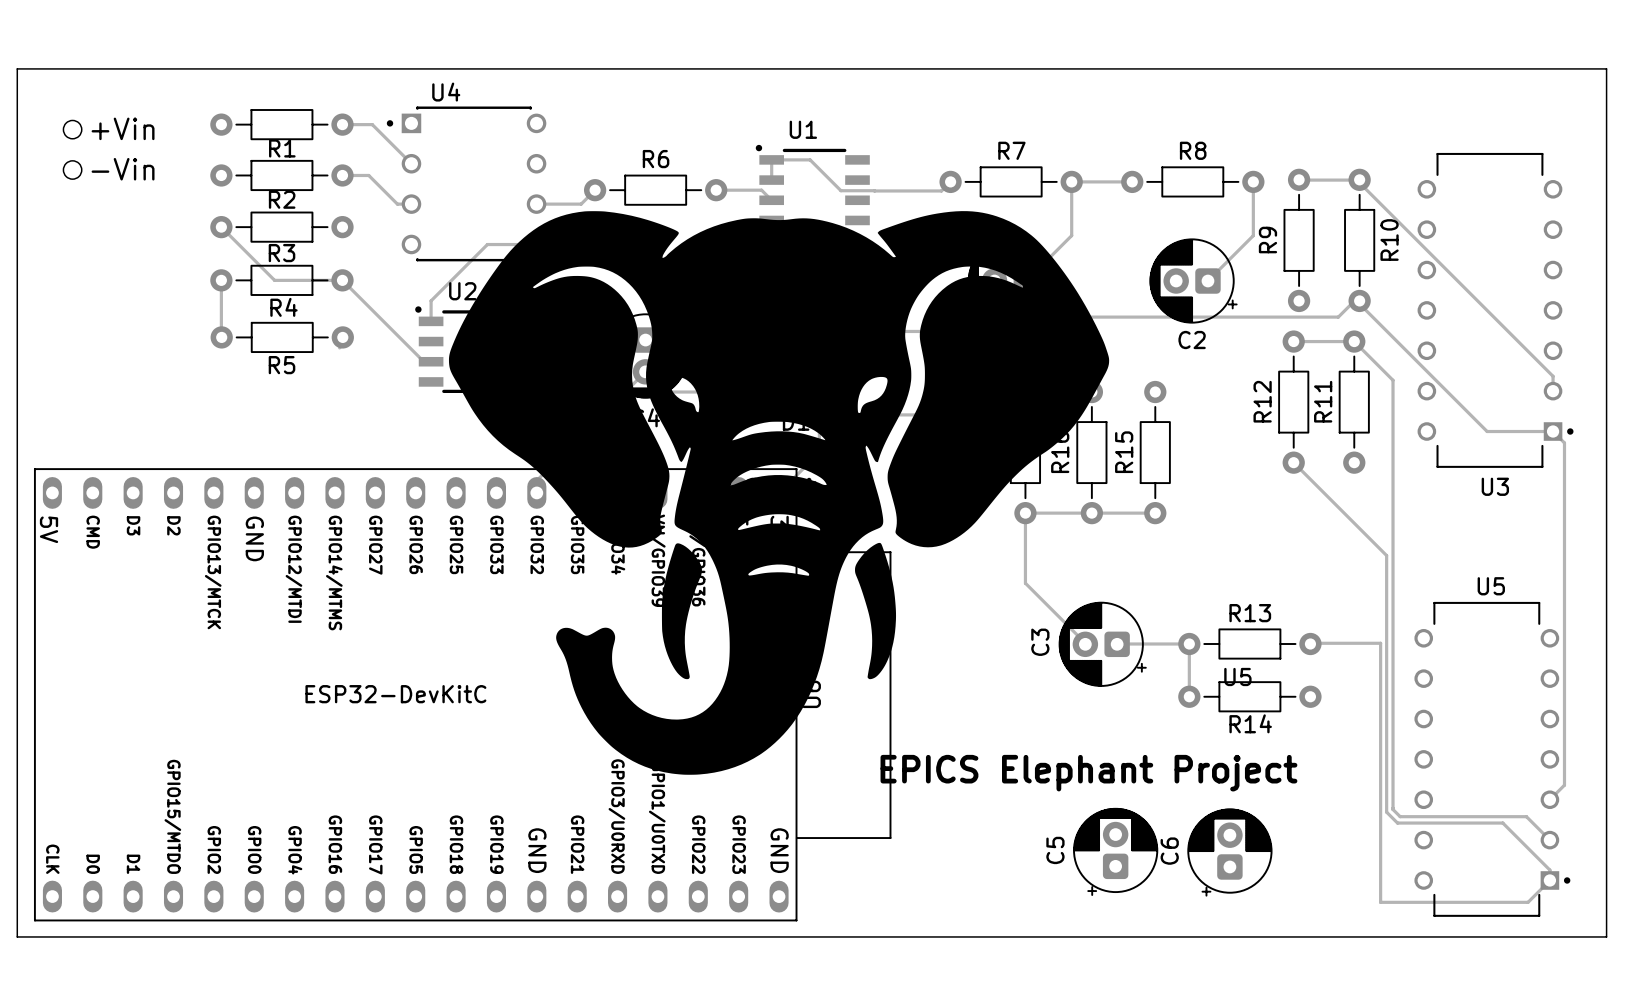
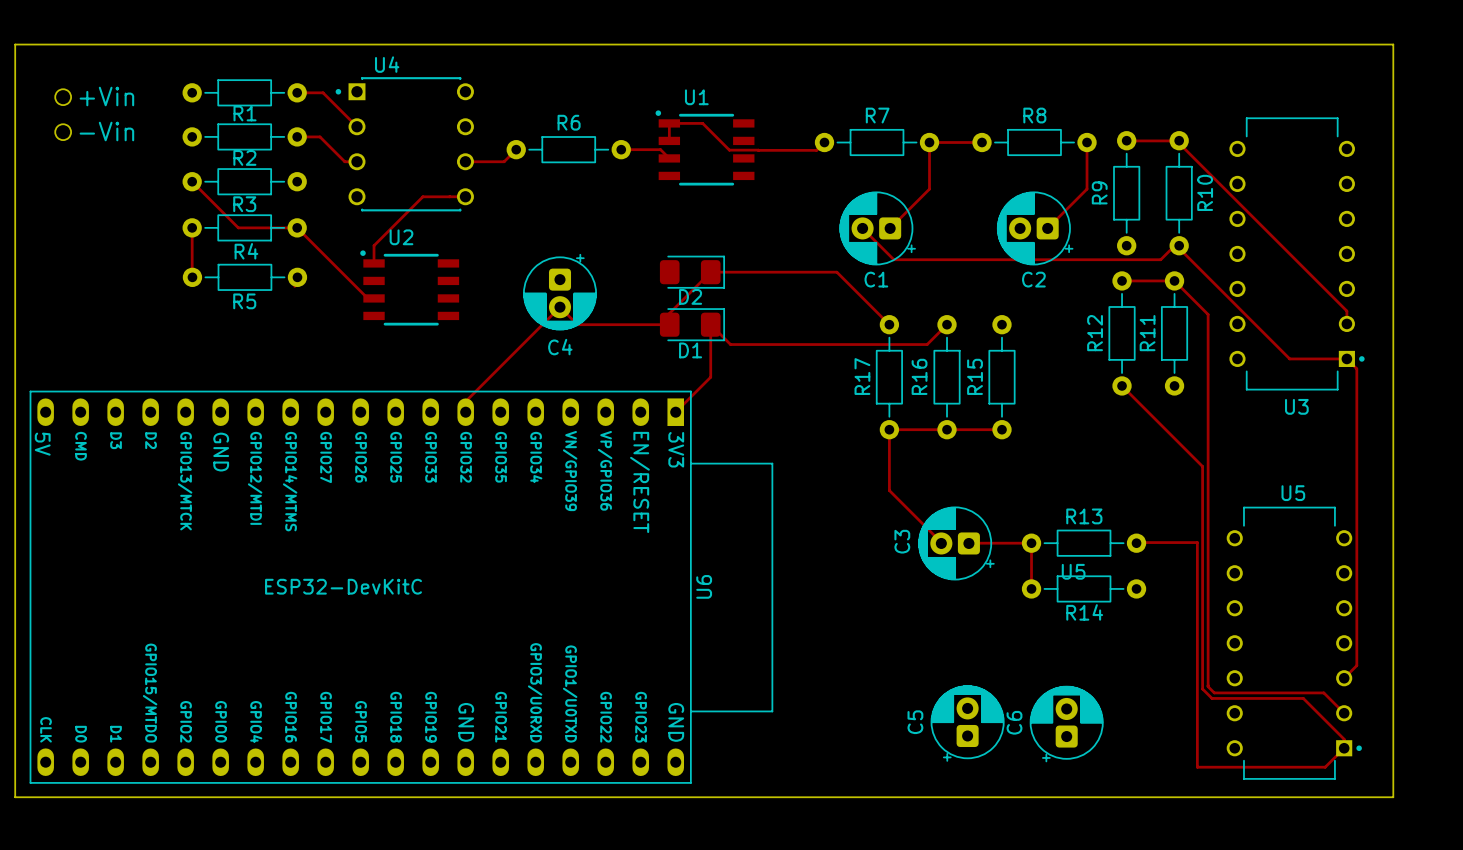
part: (779, 492) -> none
text: EPICS Elephant Project (1088, 773) -> none

